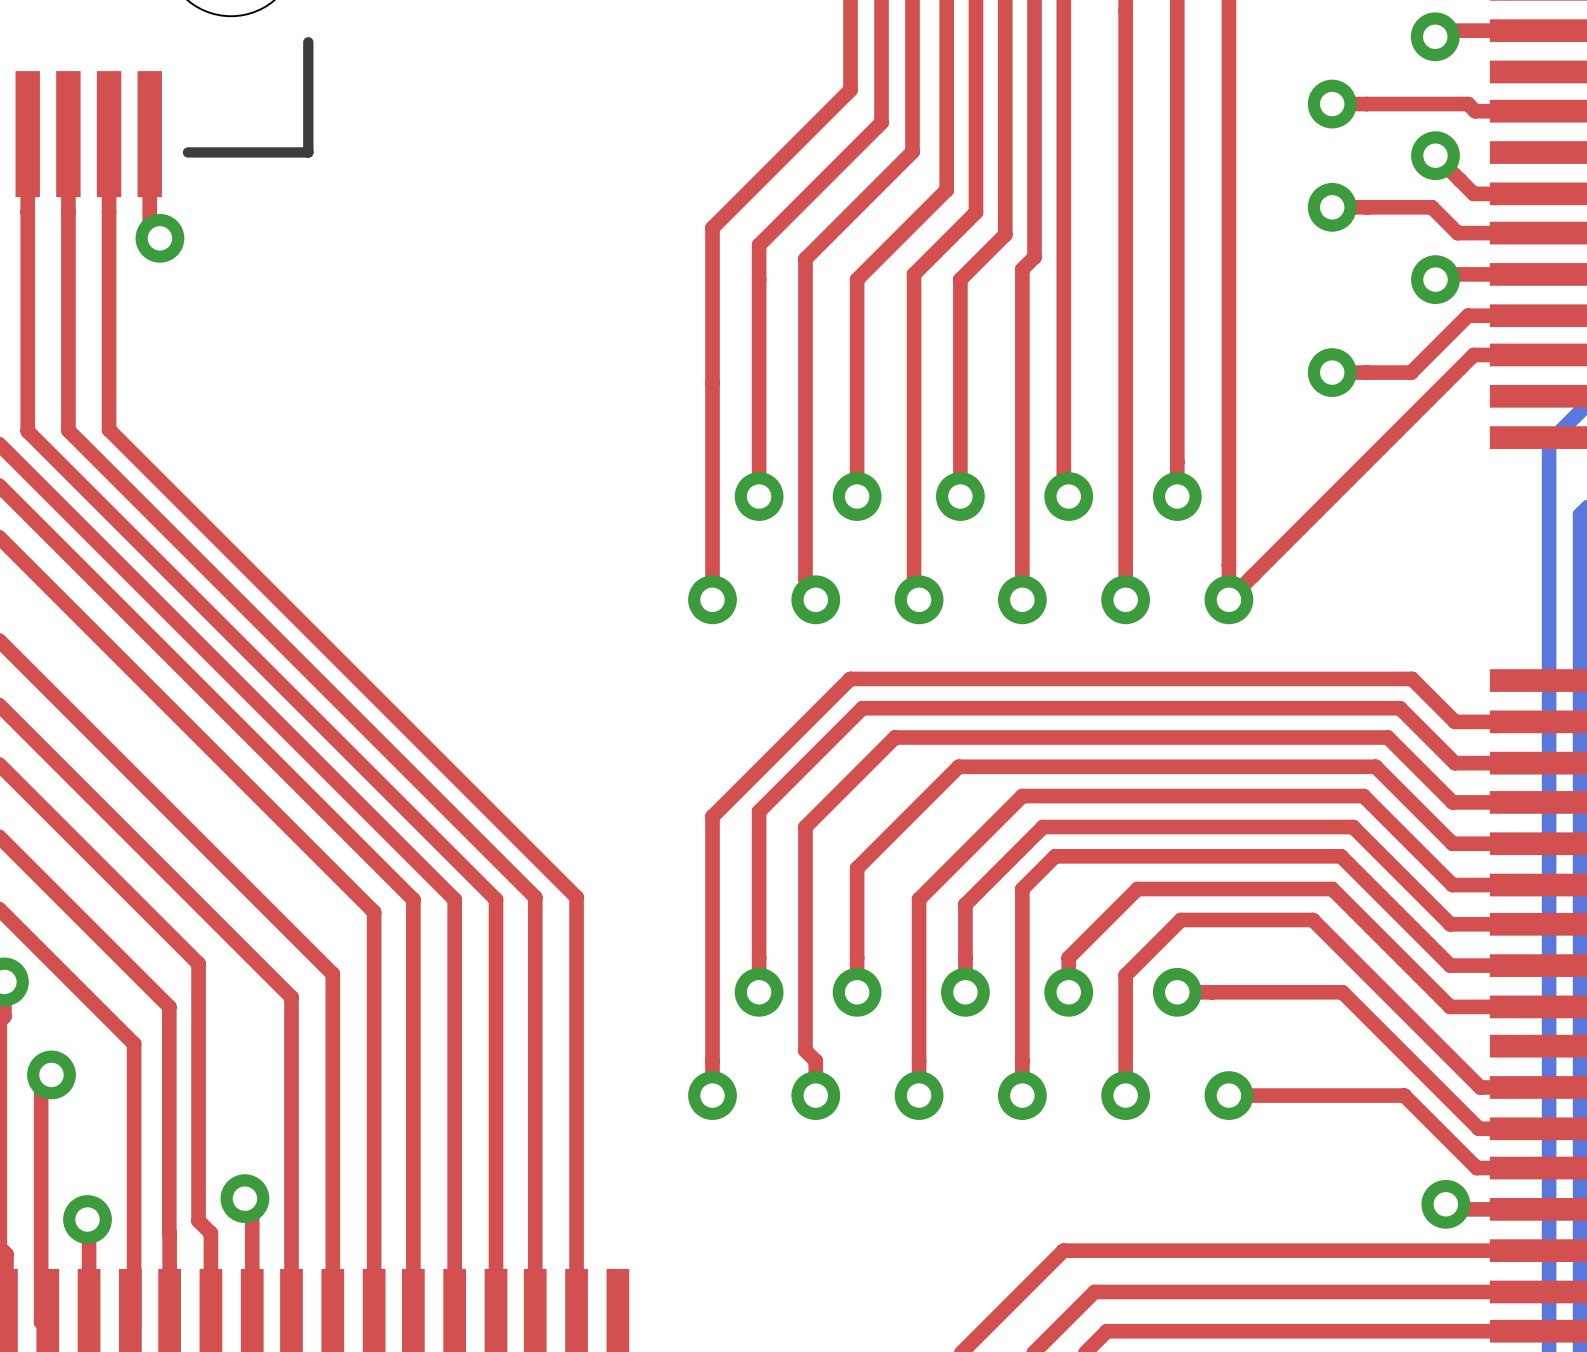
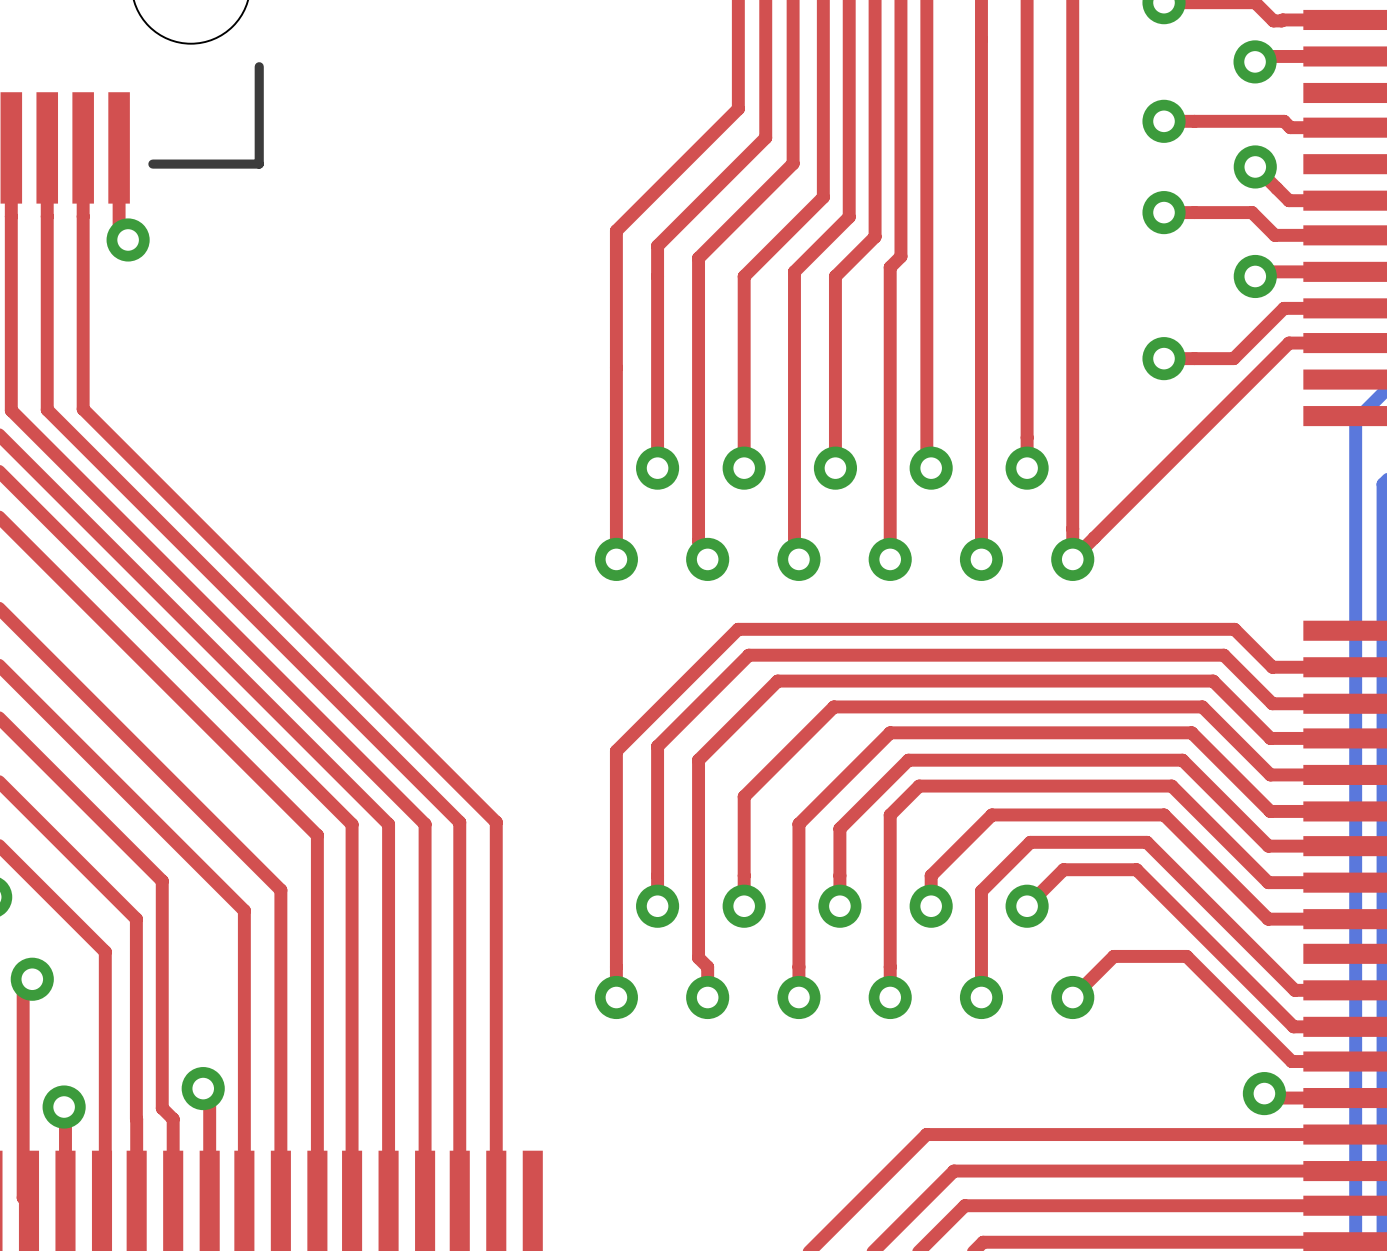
top track: (1177, 992) (1342, 992) -> (1027, 906) (1063, 869) (1136, 869) (1173, 906)
top track: (1228, 1095) (1404, 1095) -> (1072, 997) (1113, 956) (1186, 956) (1227, 997)

